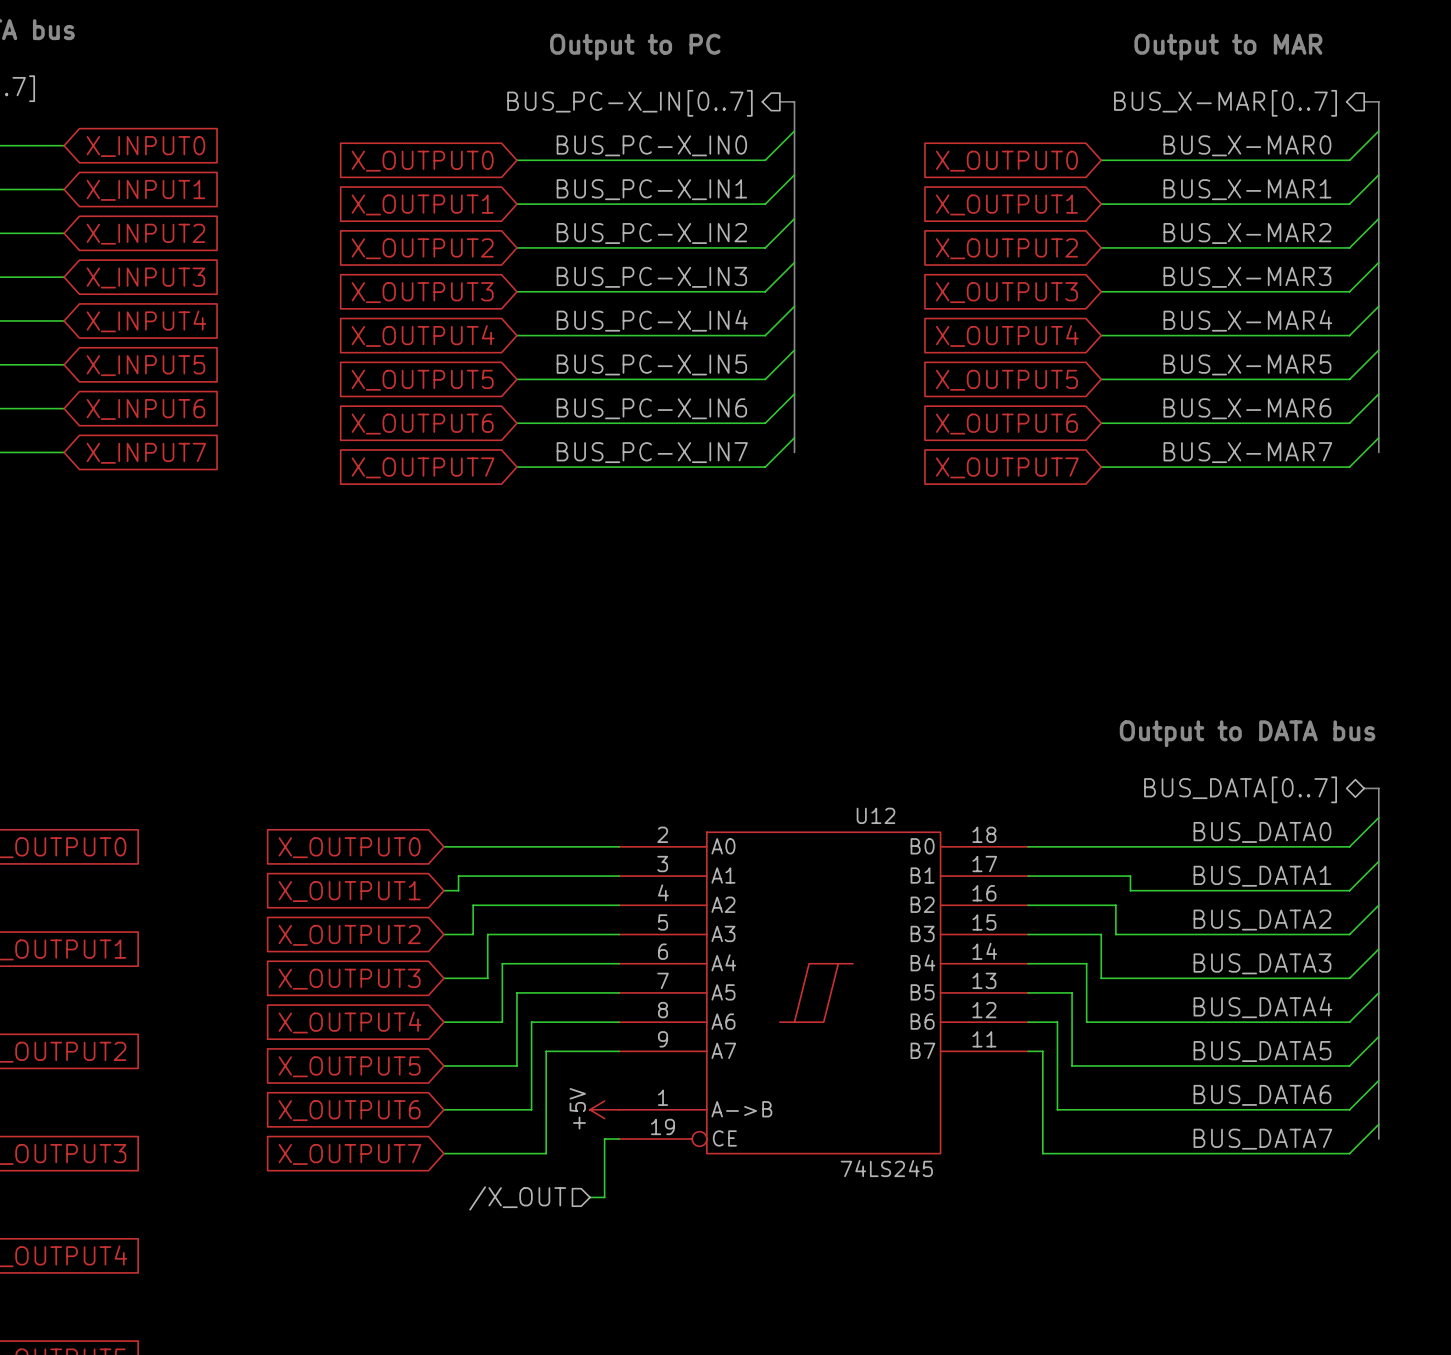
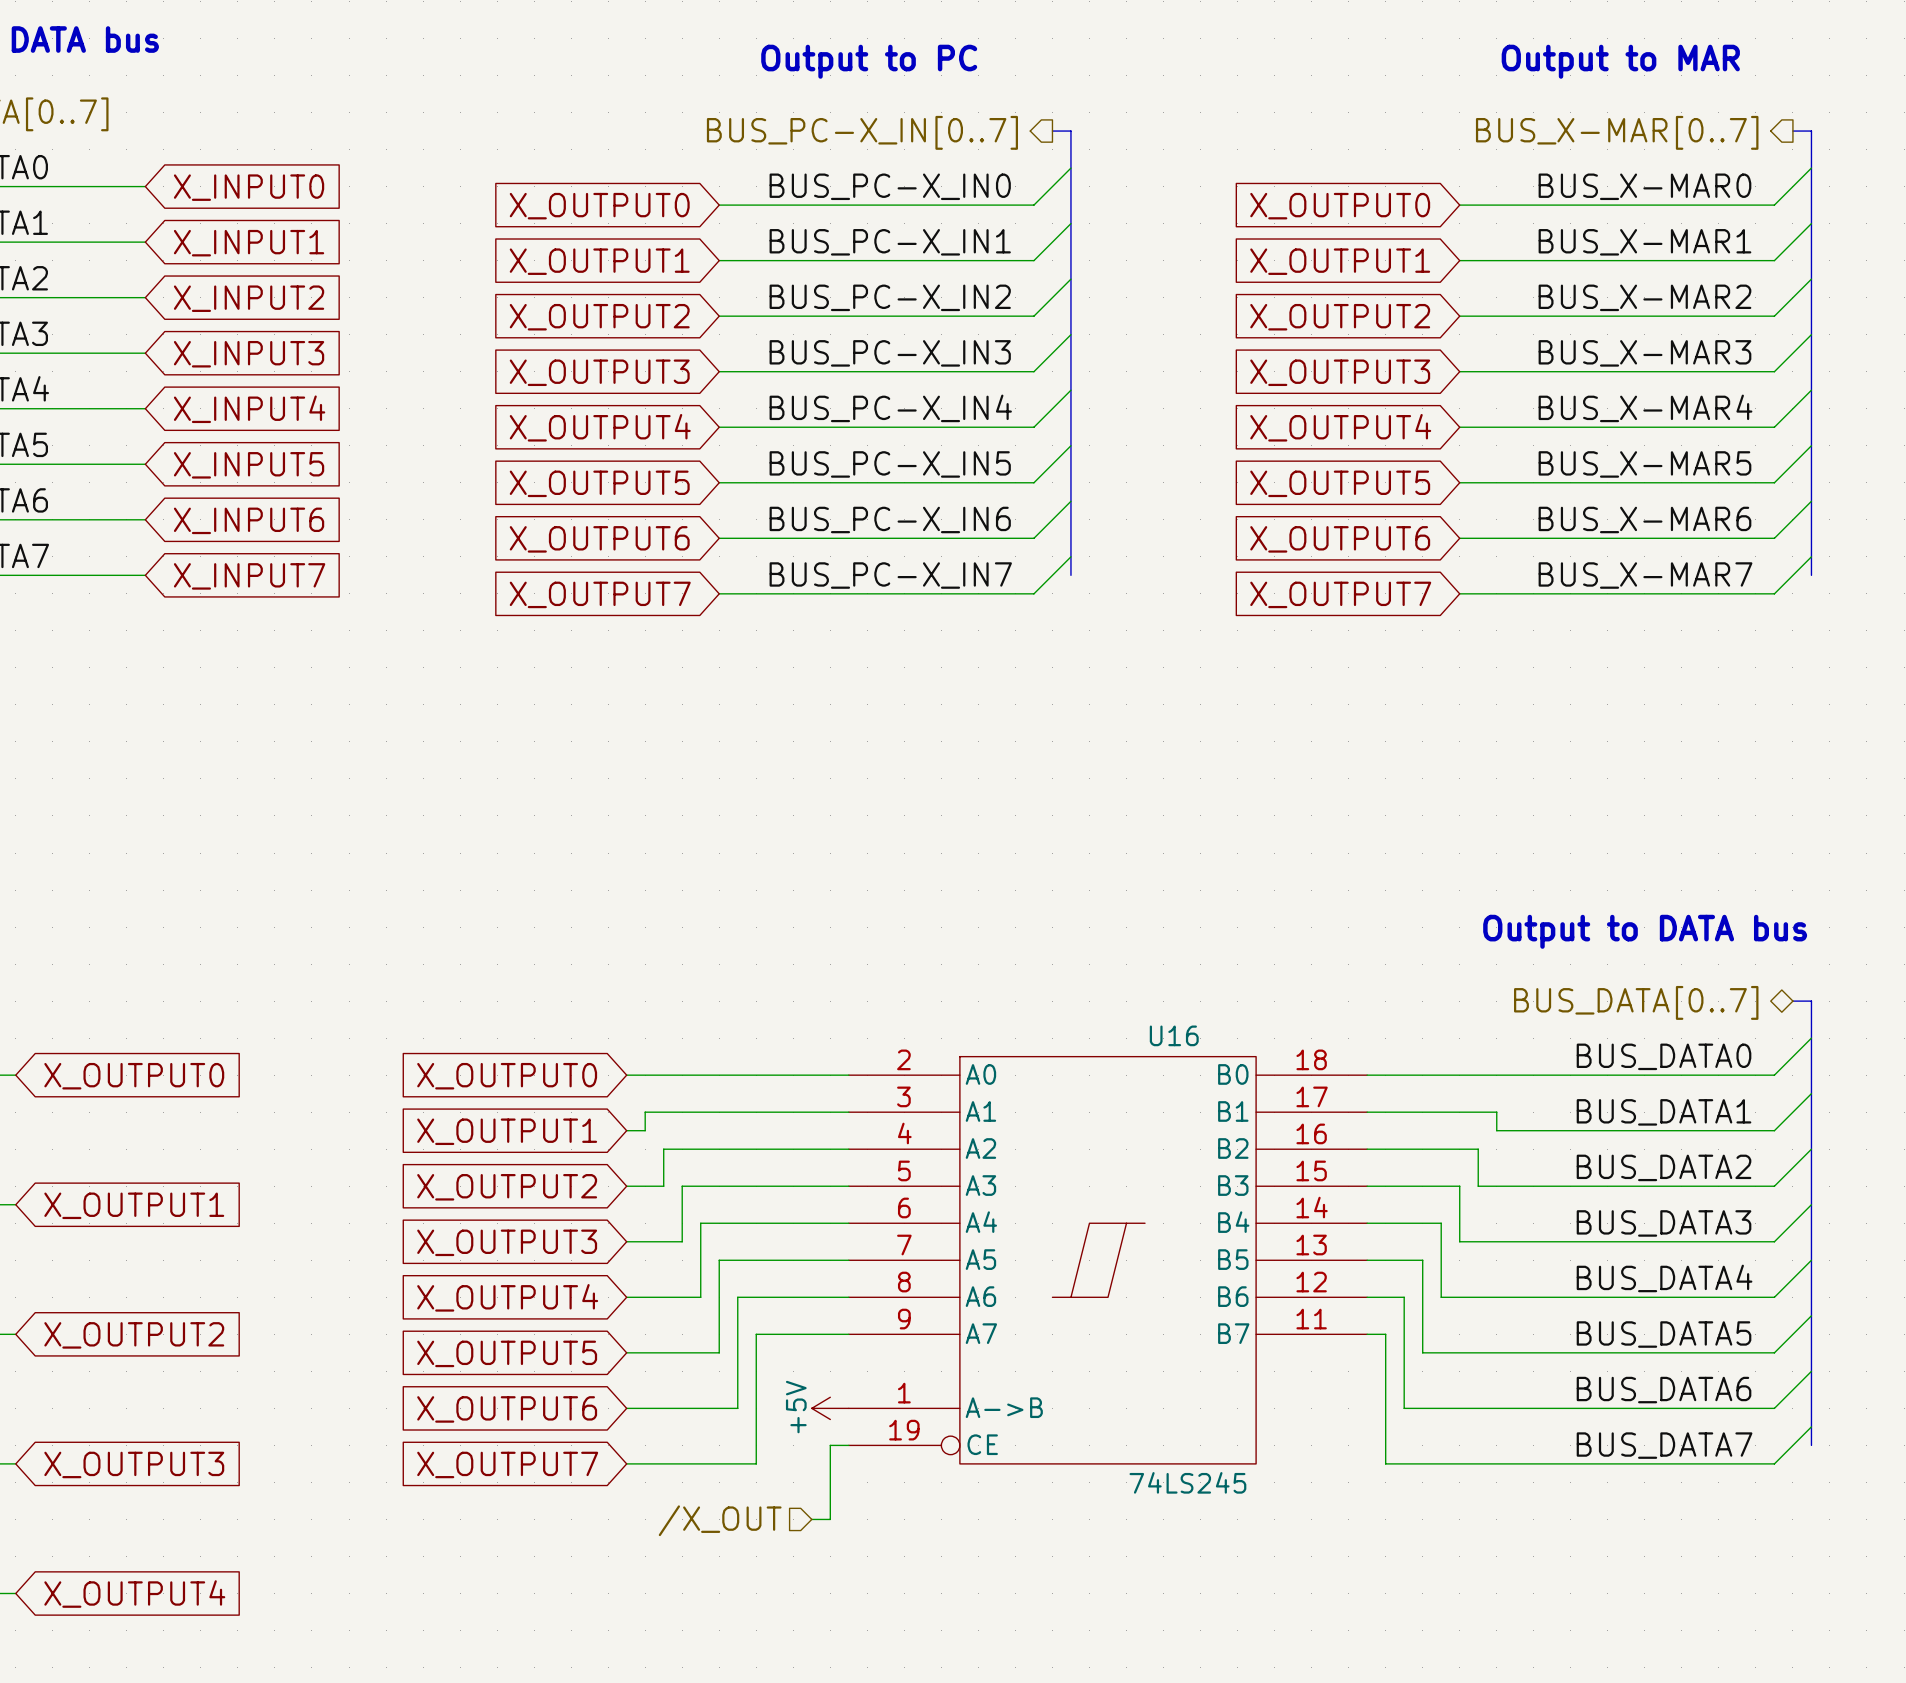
U12 name: U12 (876, 815) -> U16 (1174, 1035)

